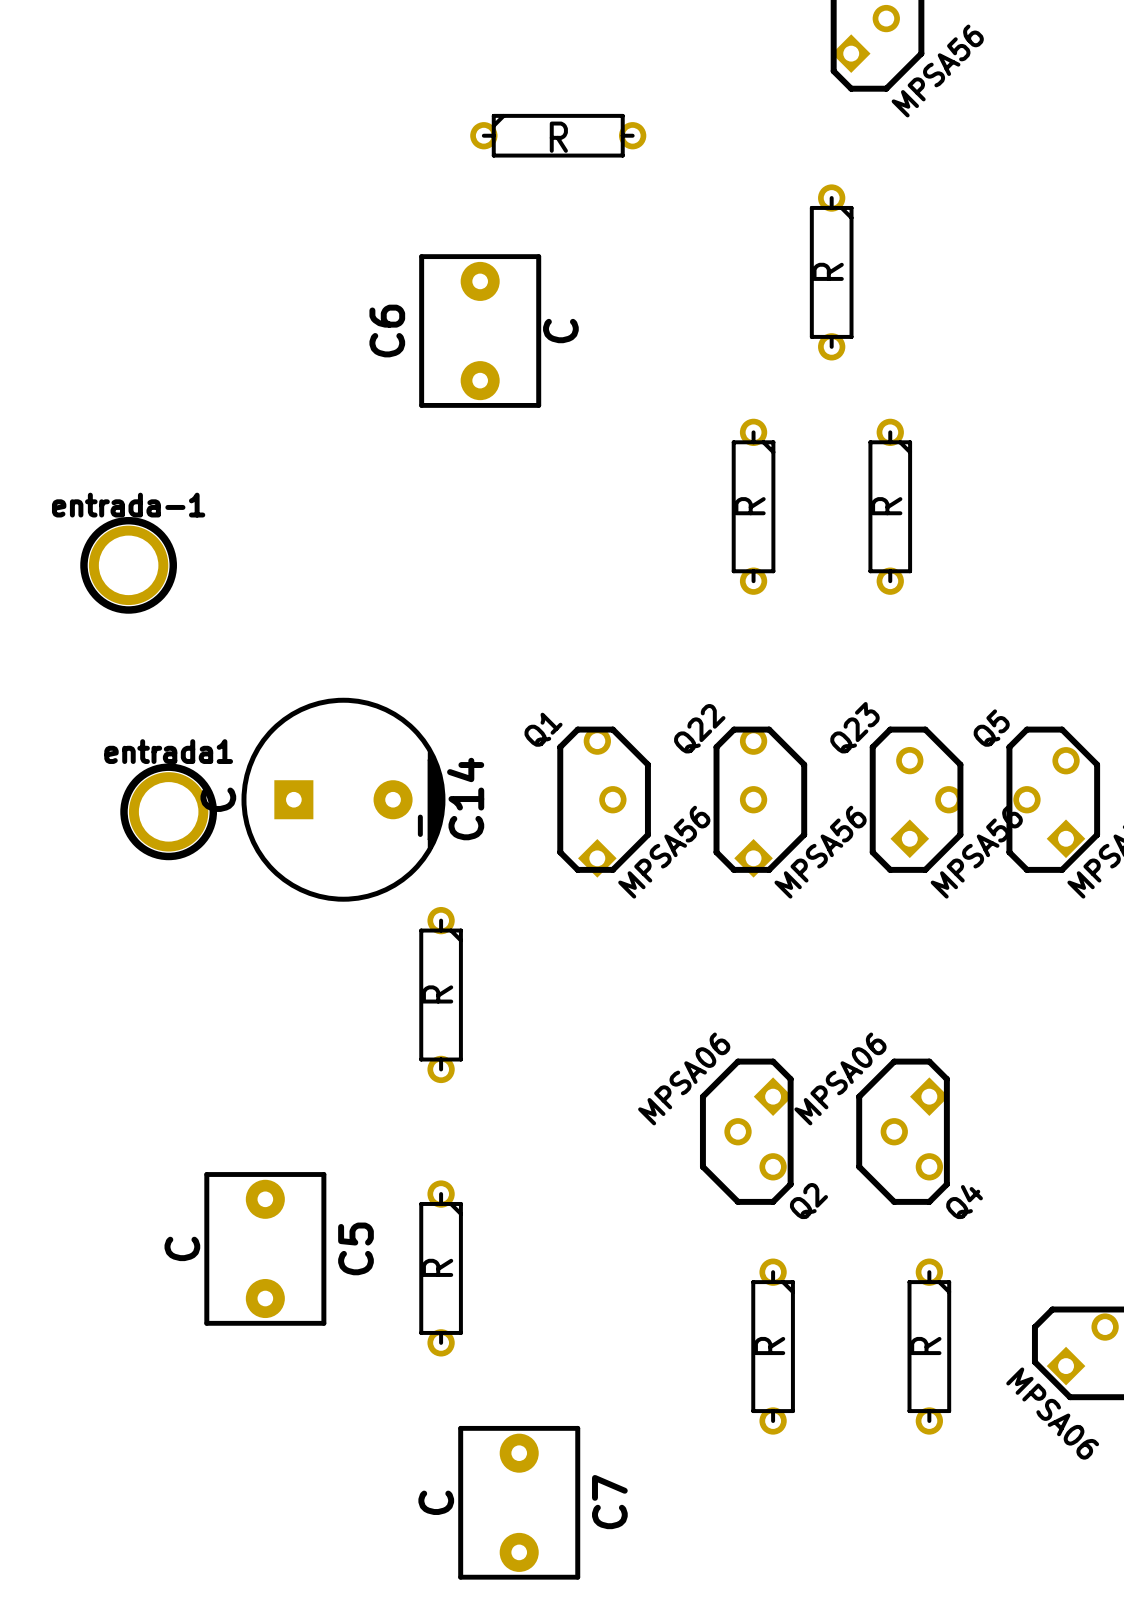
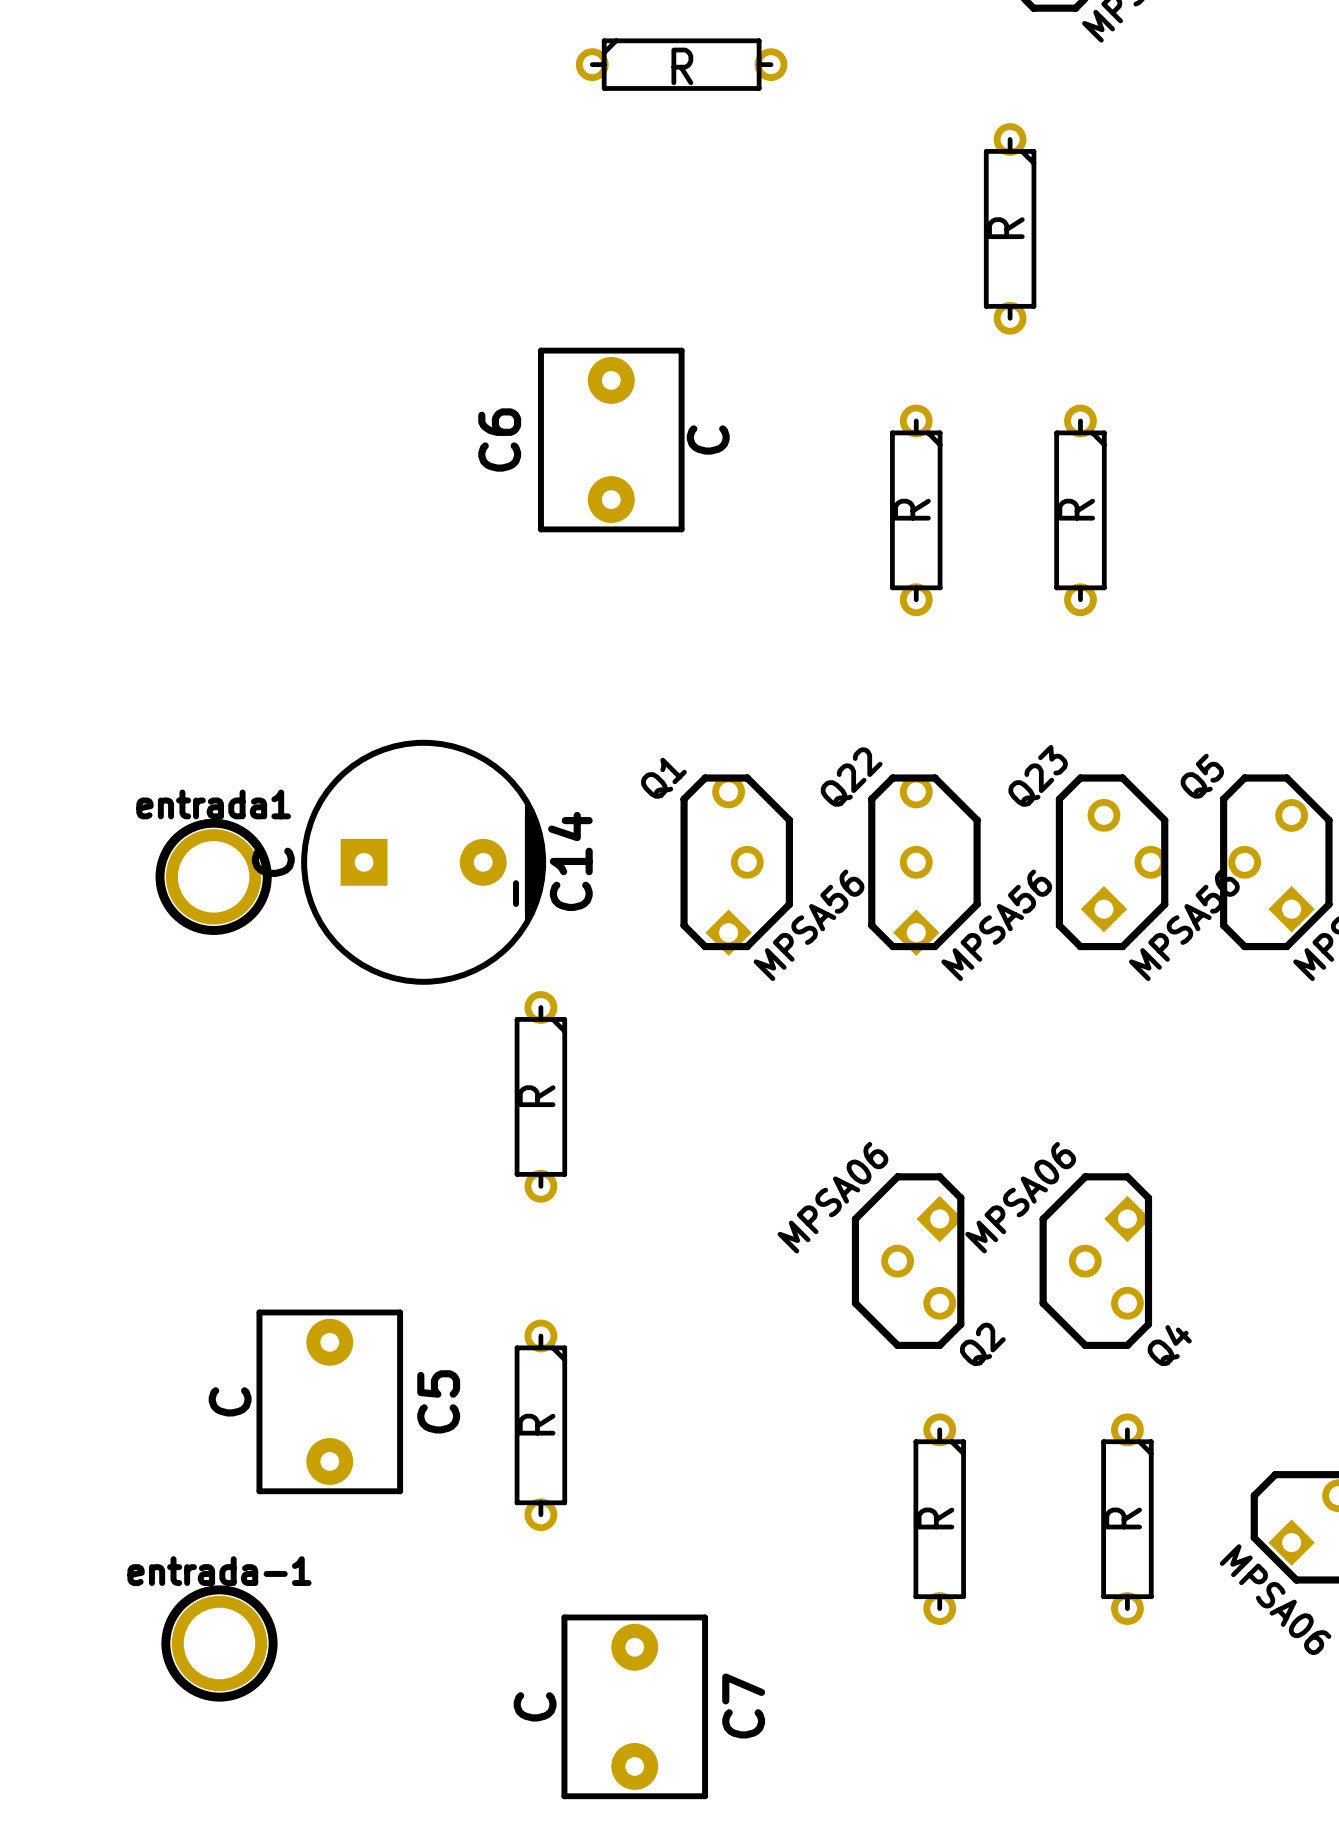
C6 position: (480, 331) -> (611, 440)
entrada-1 position: (128, 565) -> (219, 1643)

